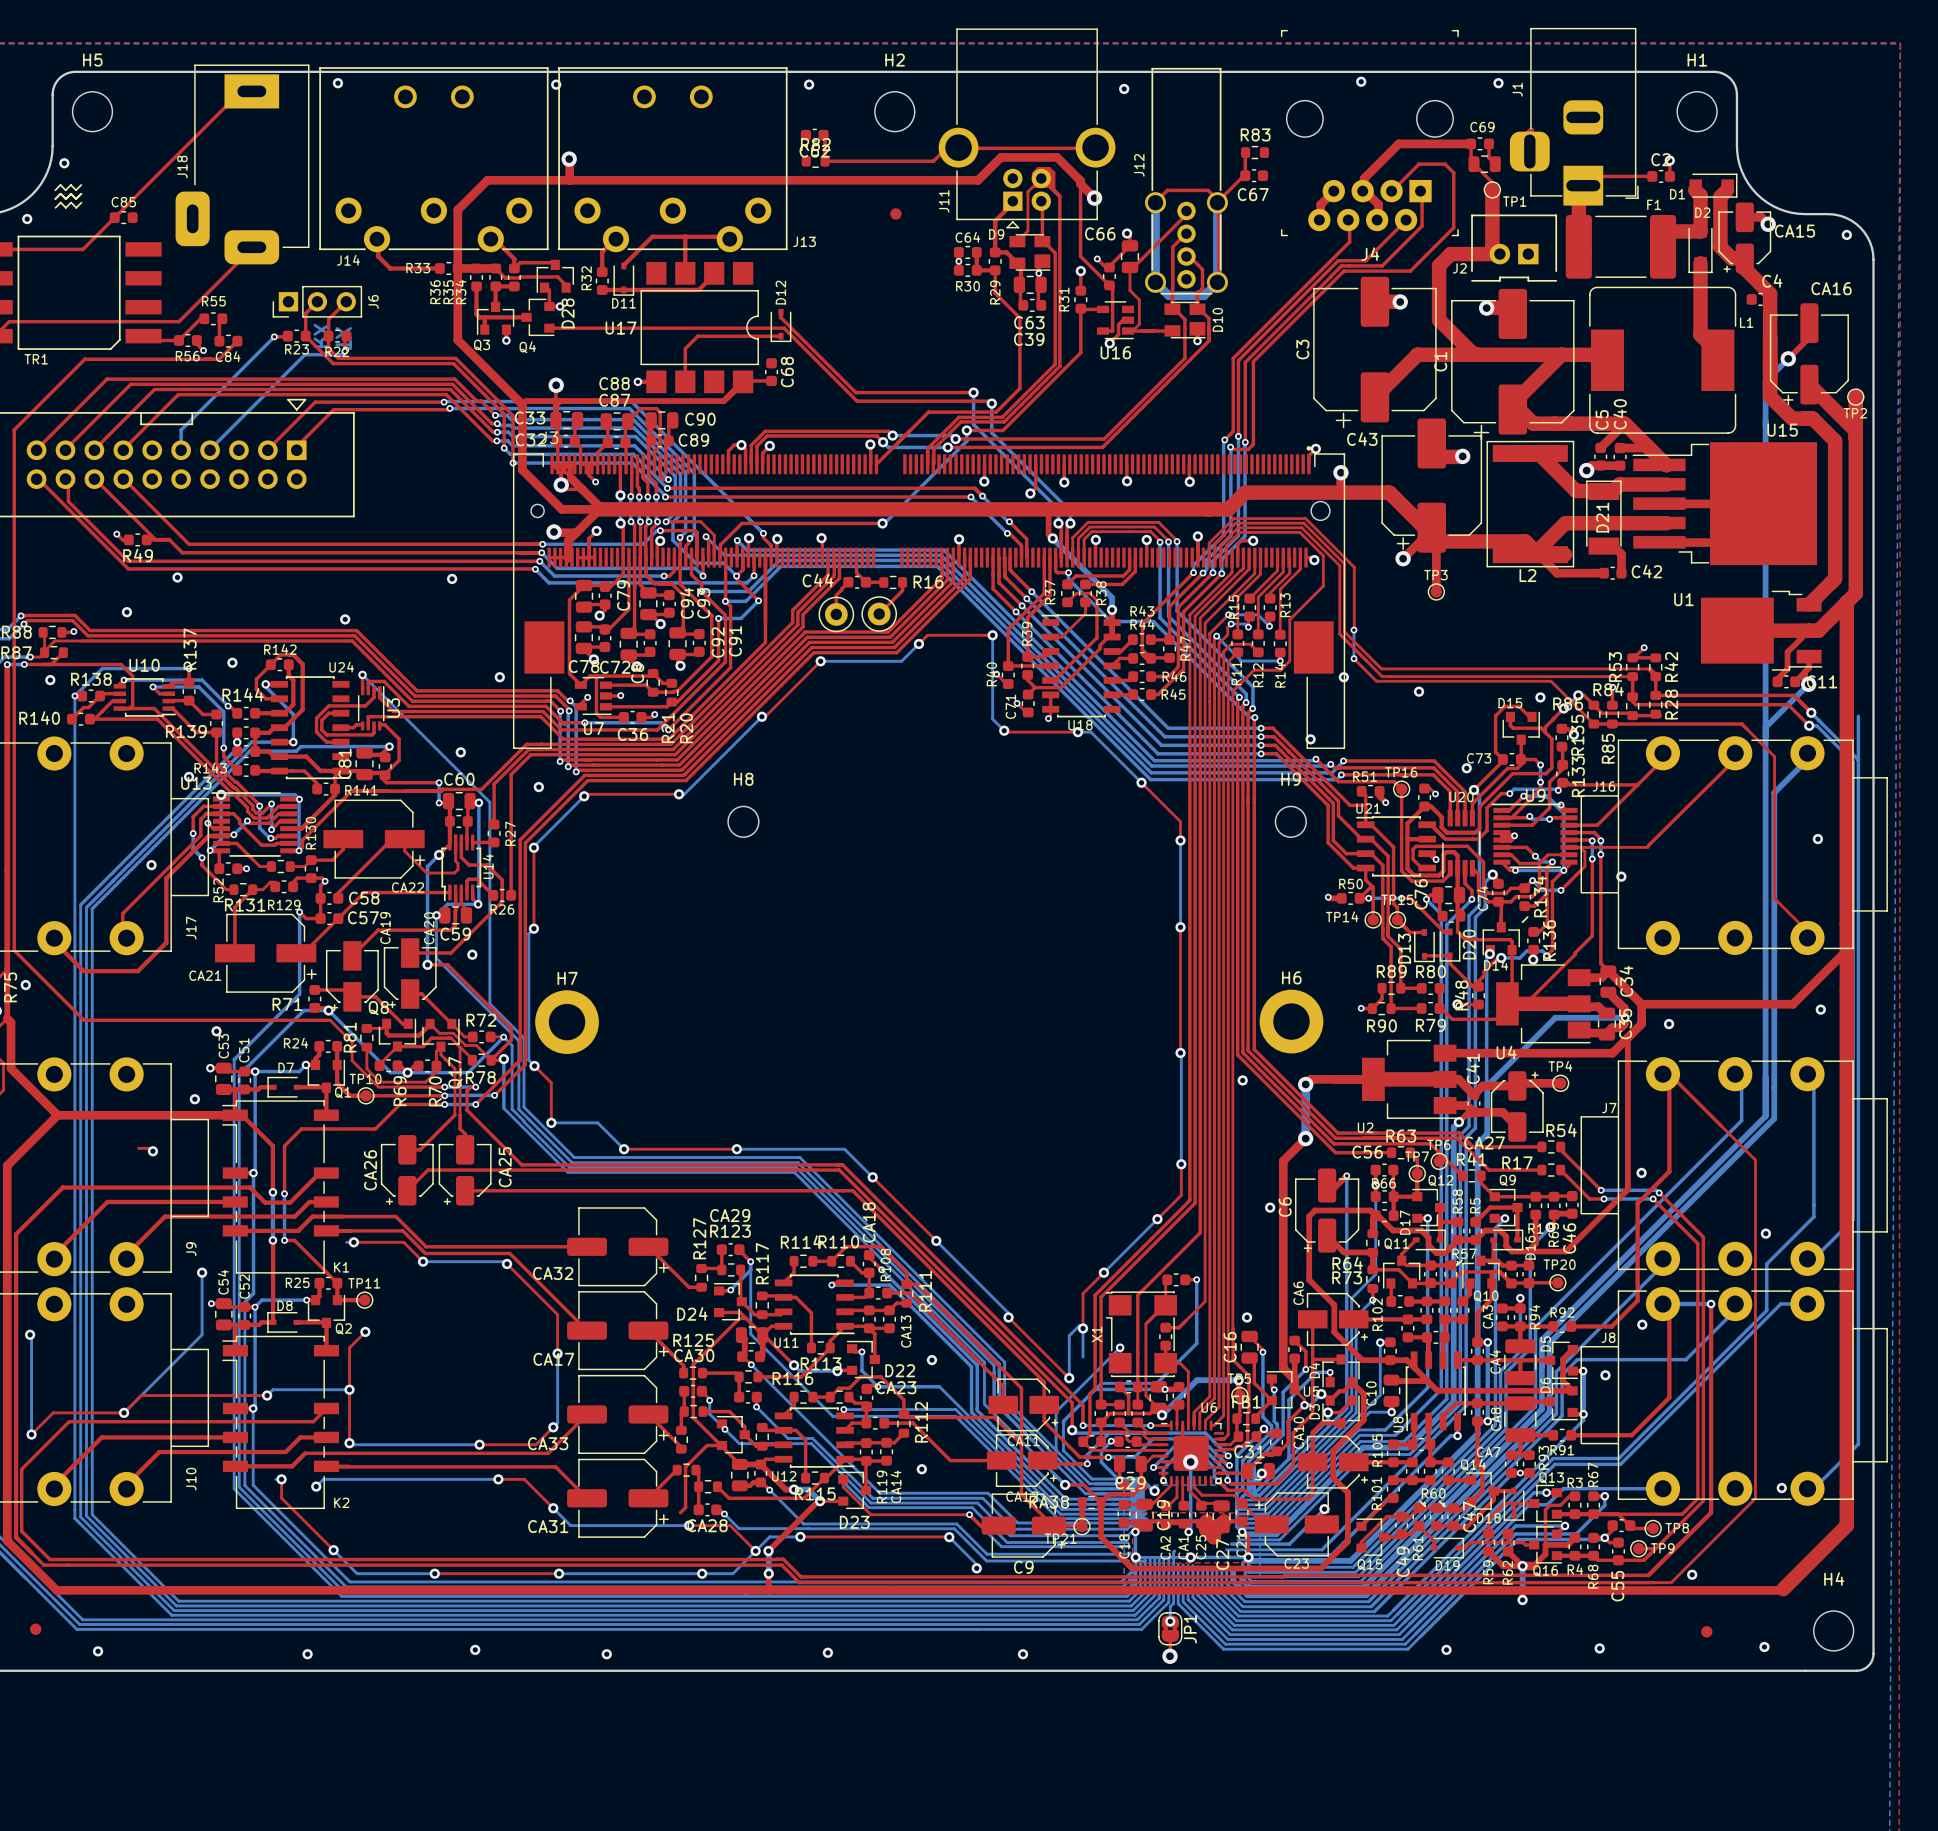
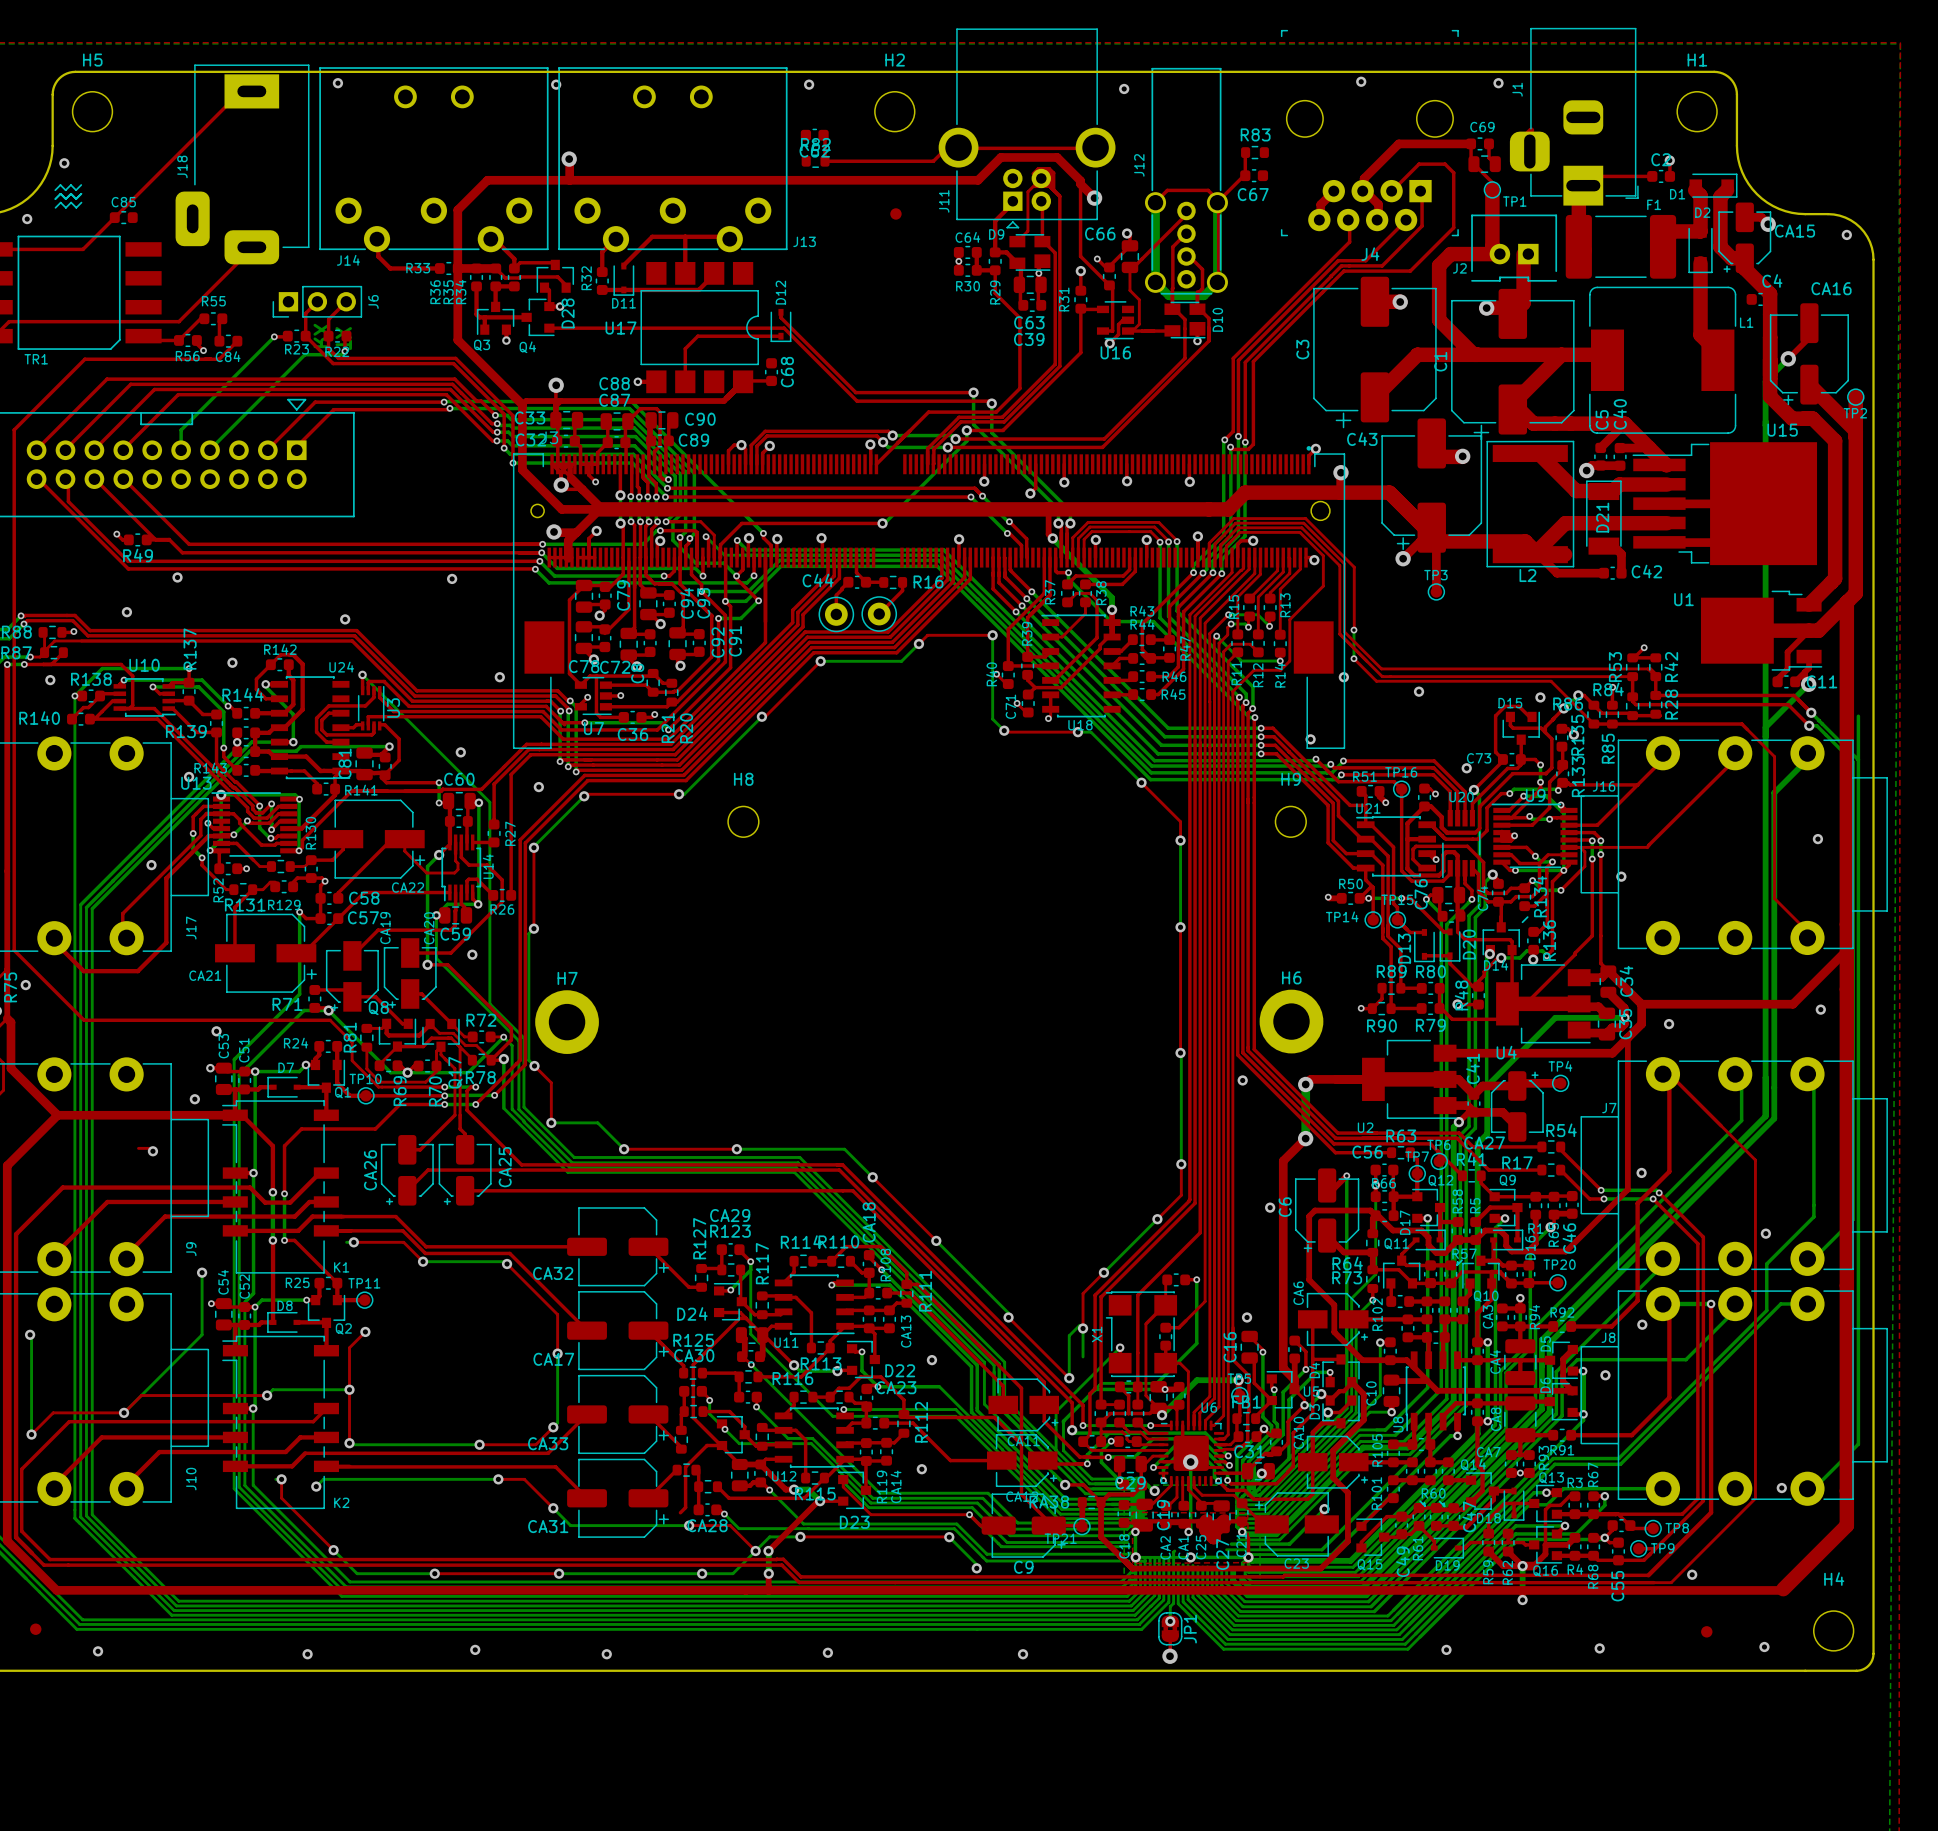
top track: none -> (1523, 254) (1523, 303) (1512, 313)

